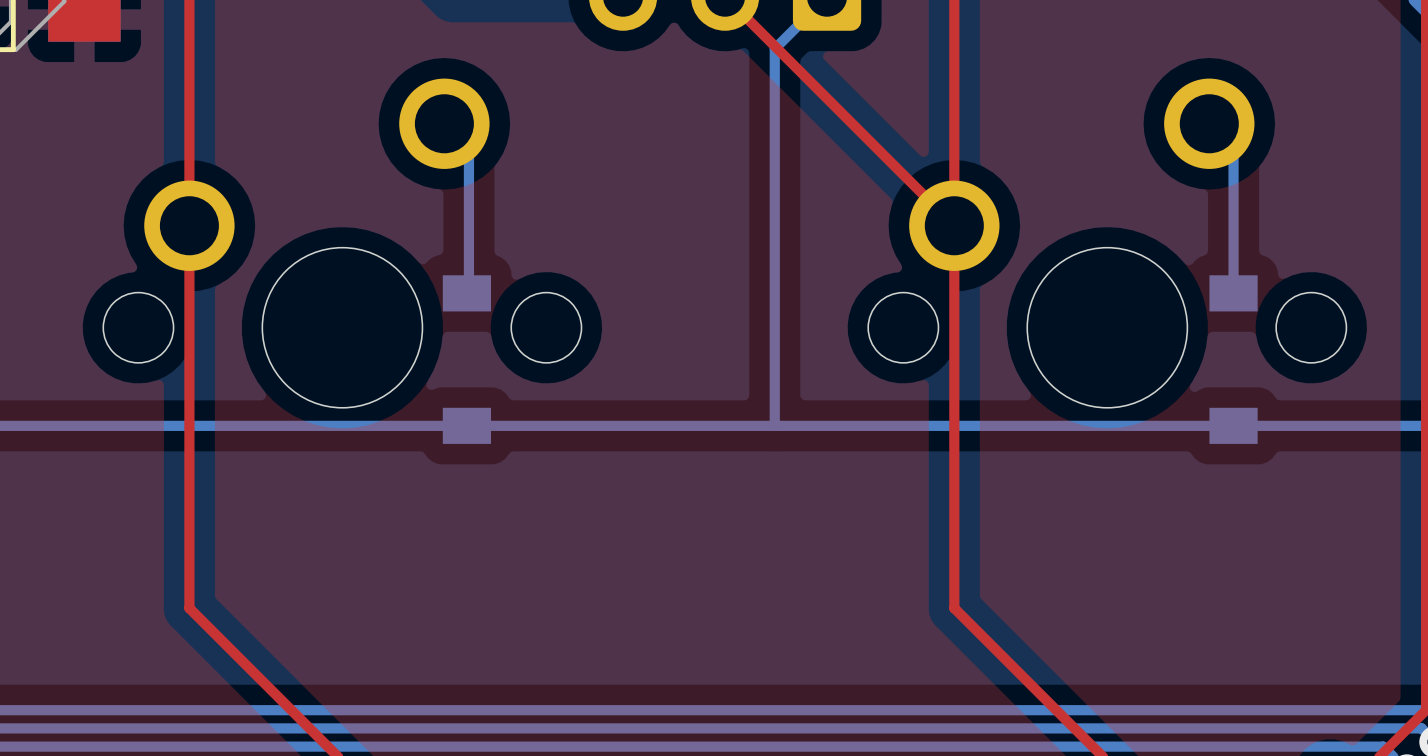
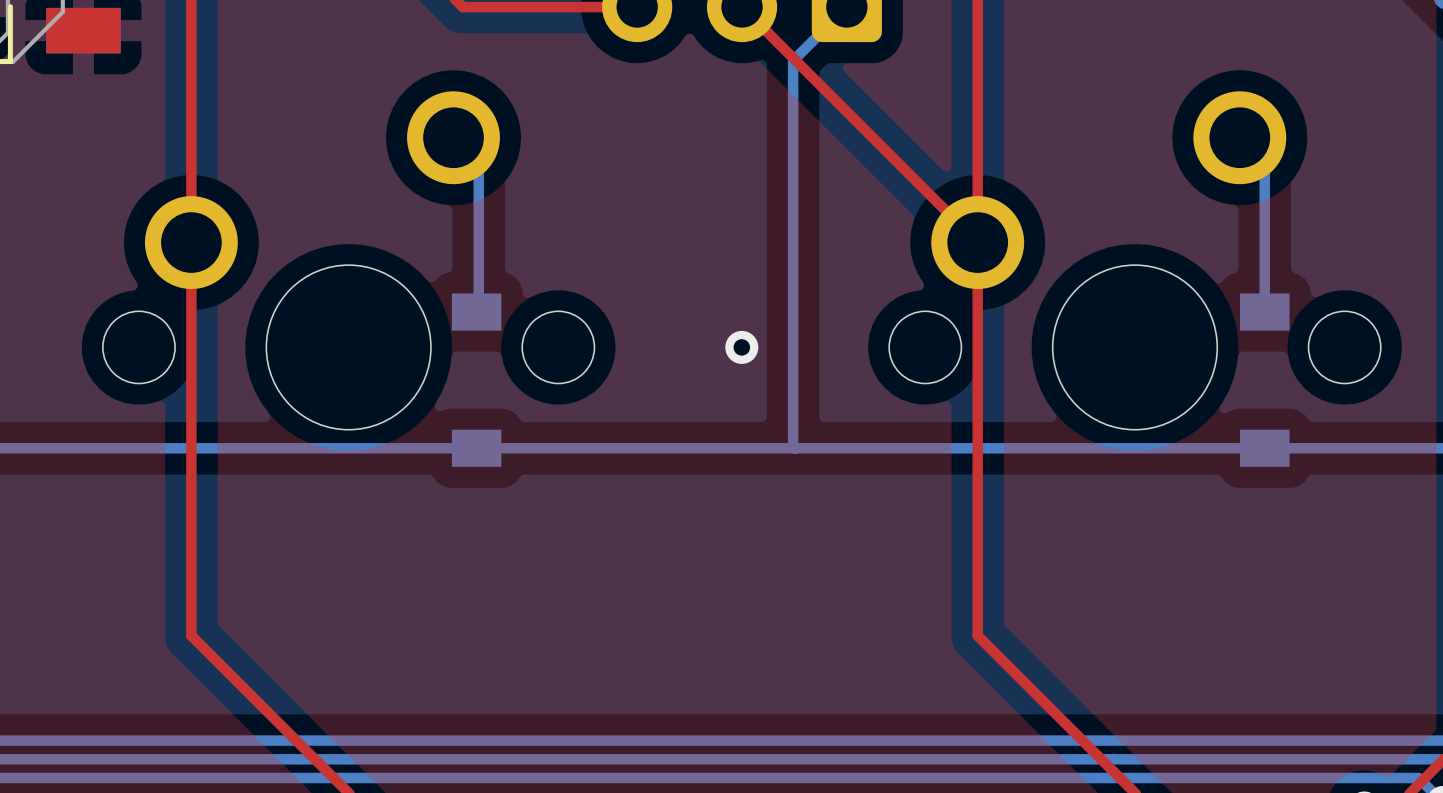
via: none -> (741, 347)

